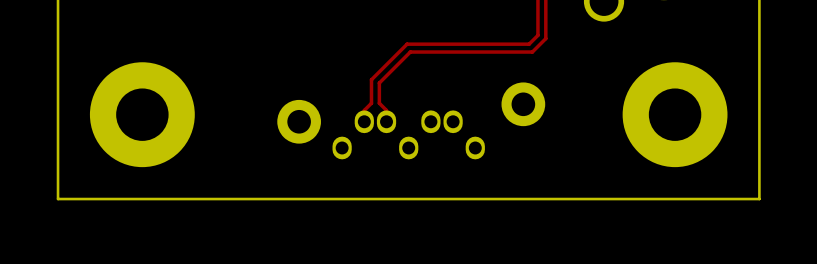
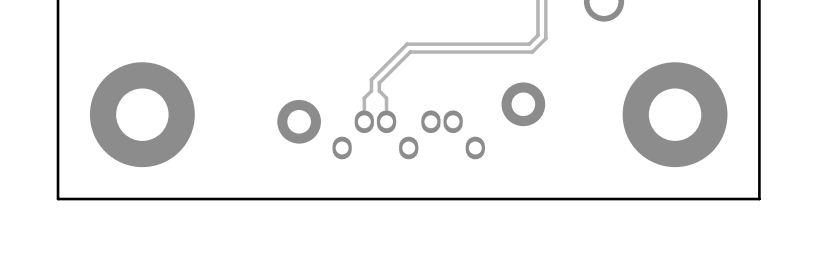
track: (371, 90) (371, 103) (364, 110) (364, 121) -> (371, 90) (364, 98) (364, 109)
track: (379, 90) (379, 103) (386, 110) (386, 121) -> (379, 90) (386, 98) (386, 109)

